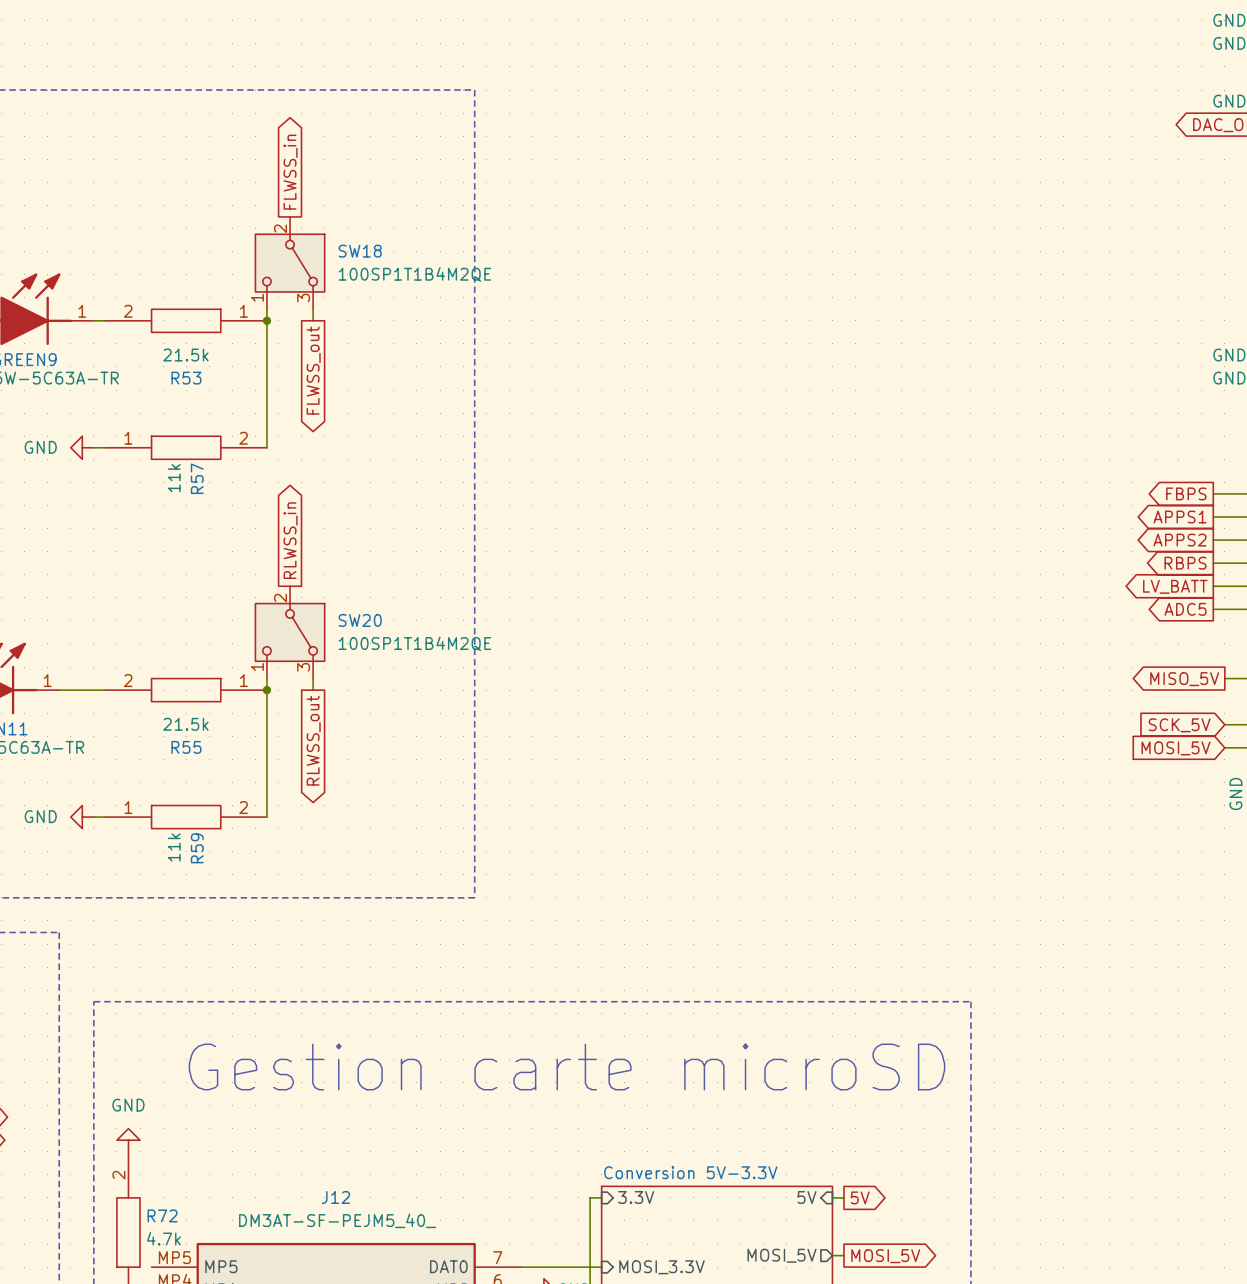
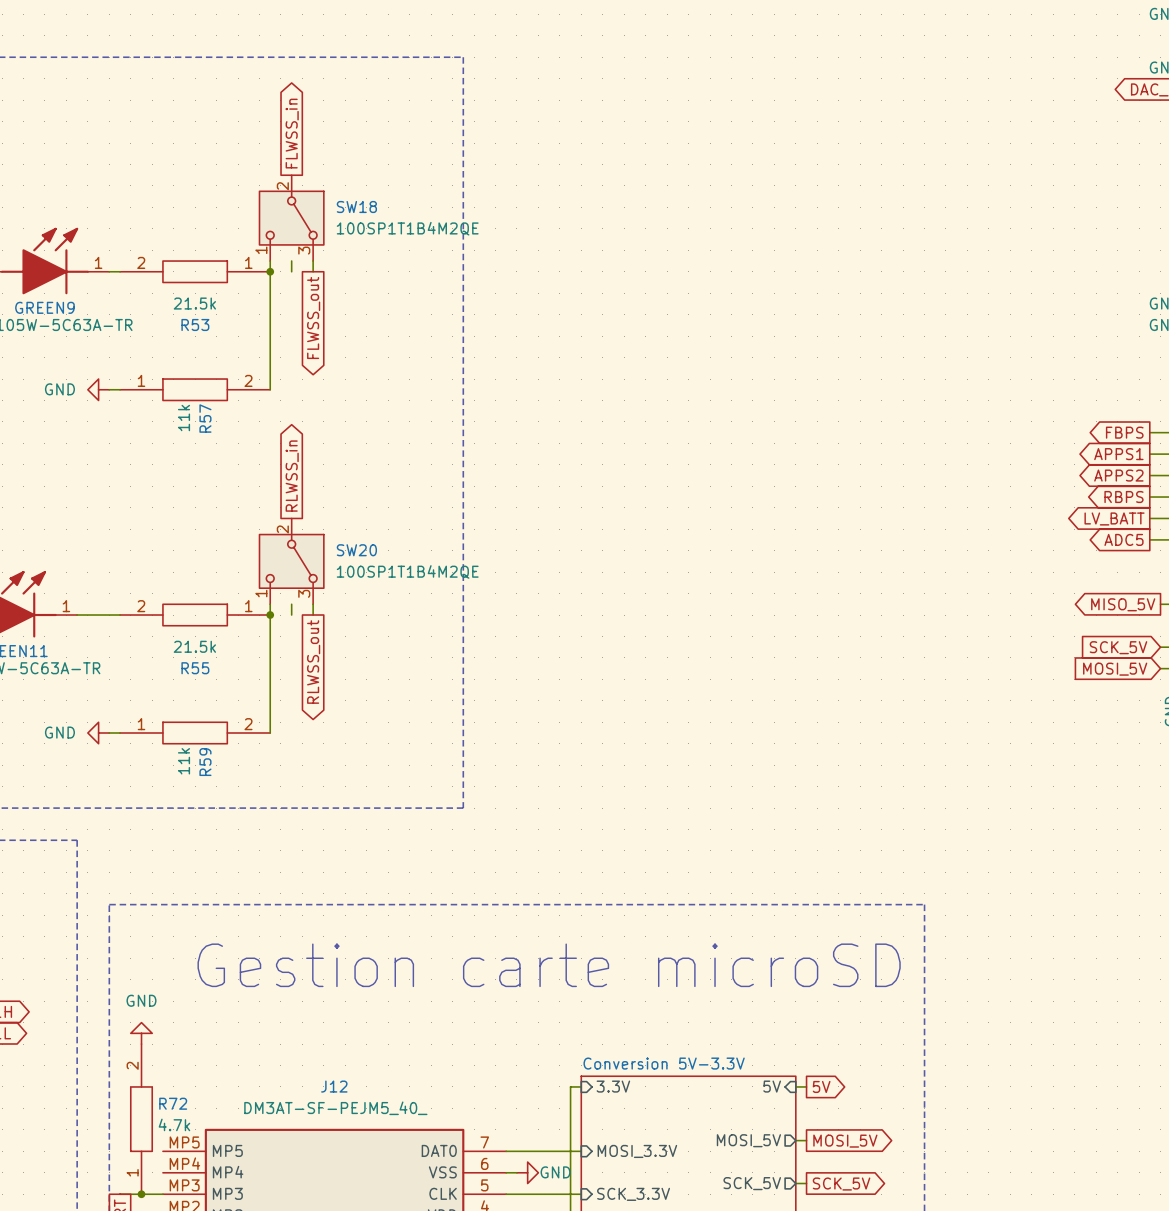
wire: none -> (291, 261) (291, 271)
wire: none -> (291, 604) (291, 615)

